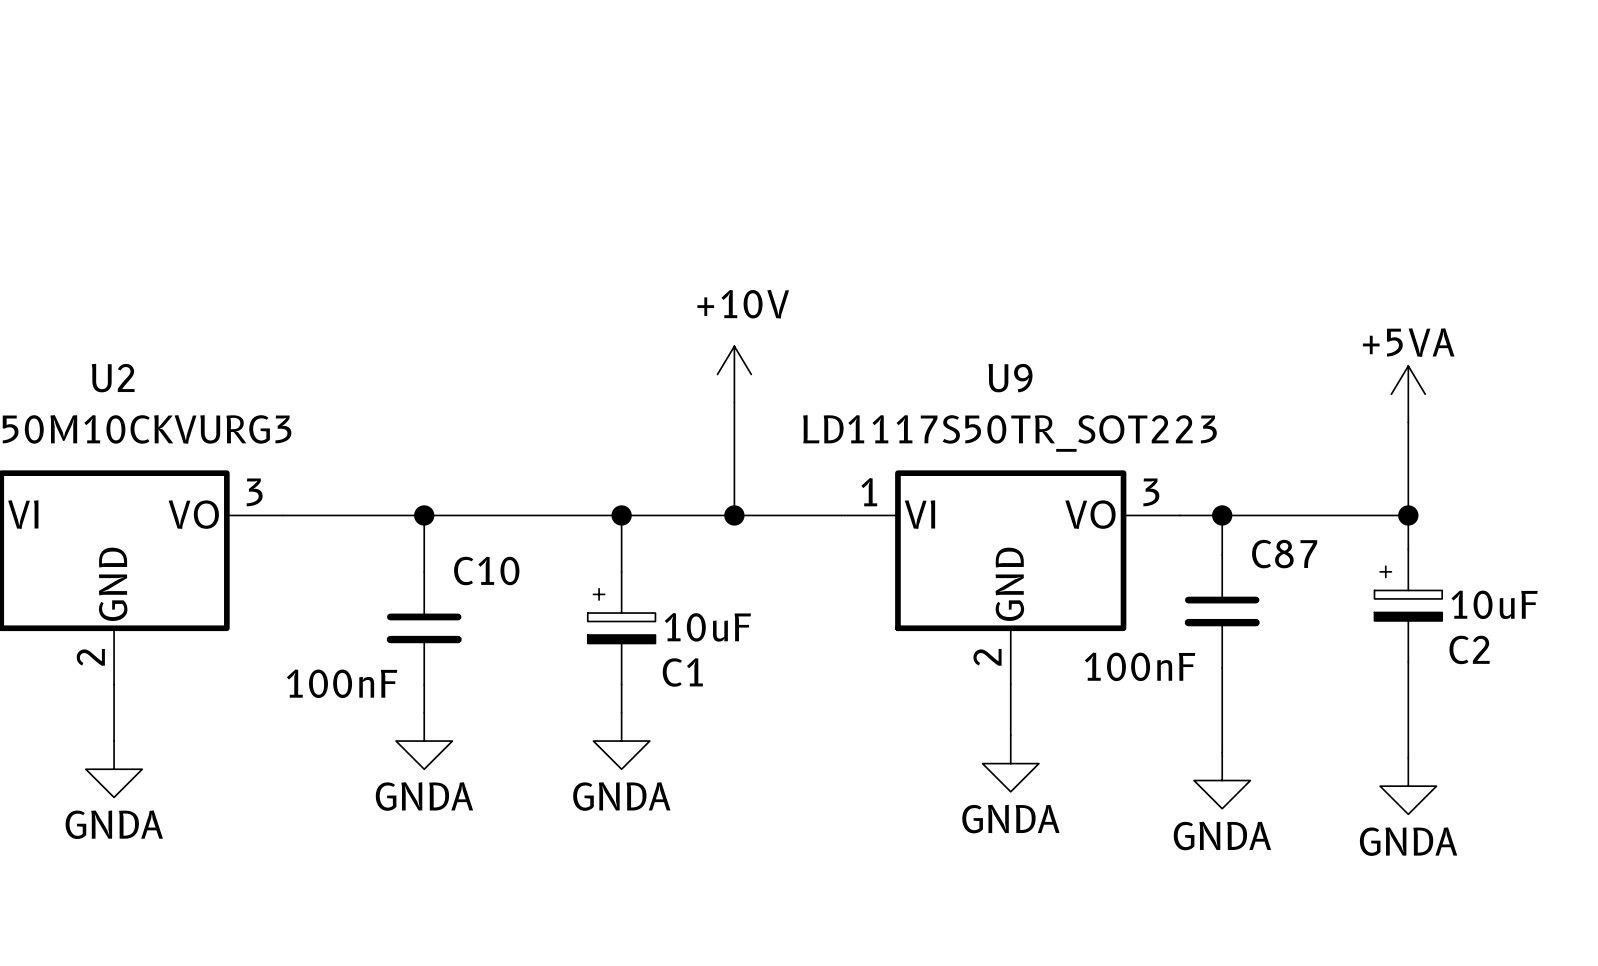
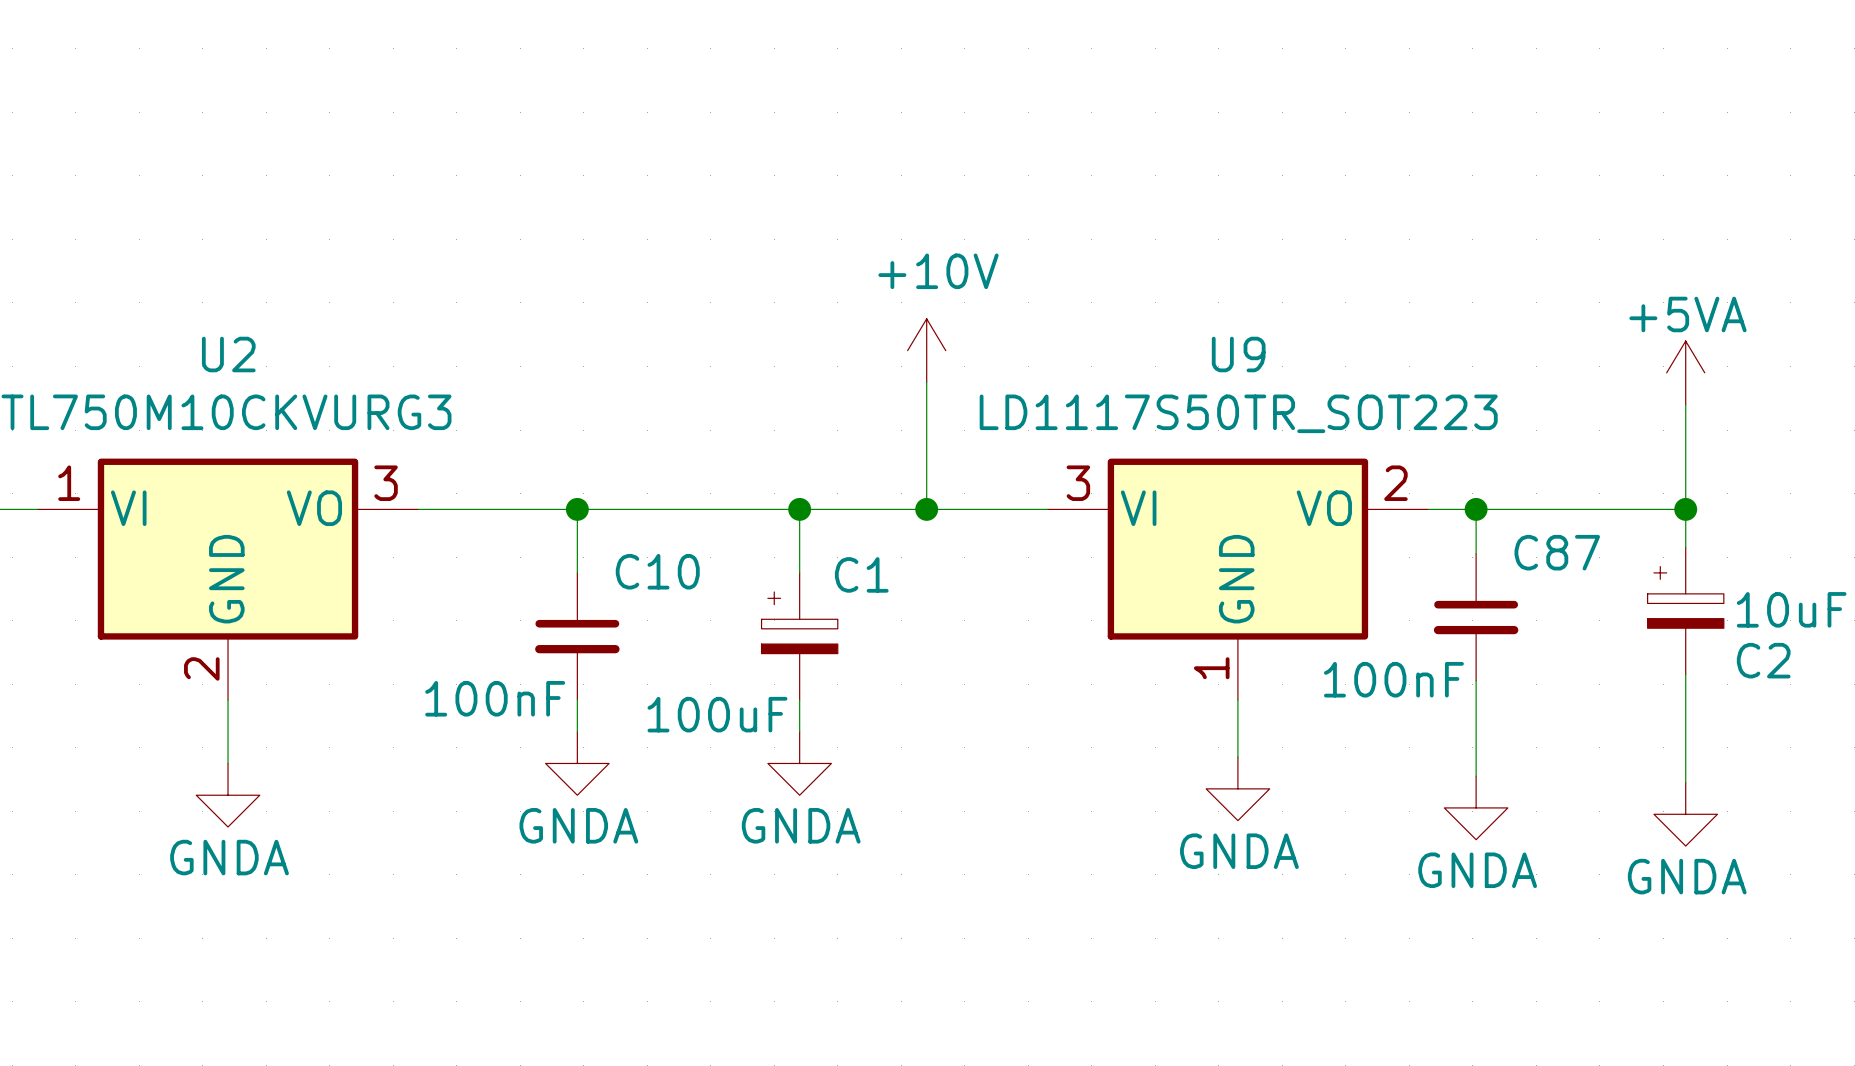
U9 pin number: 1 (869, 492) -> 3 (1078, 483)
U9 pin number: 3 (1151, 492) -> 2 (1395, 483)
C1 value: 10uF (707, 627) -> 100uF (717, 714)
U9 pin number: 2 (987, 657) -> 1 (1211, 668)
C1 name position: C1 (682, 672) -> C1 (861, 574)

